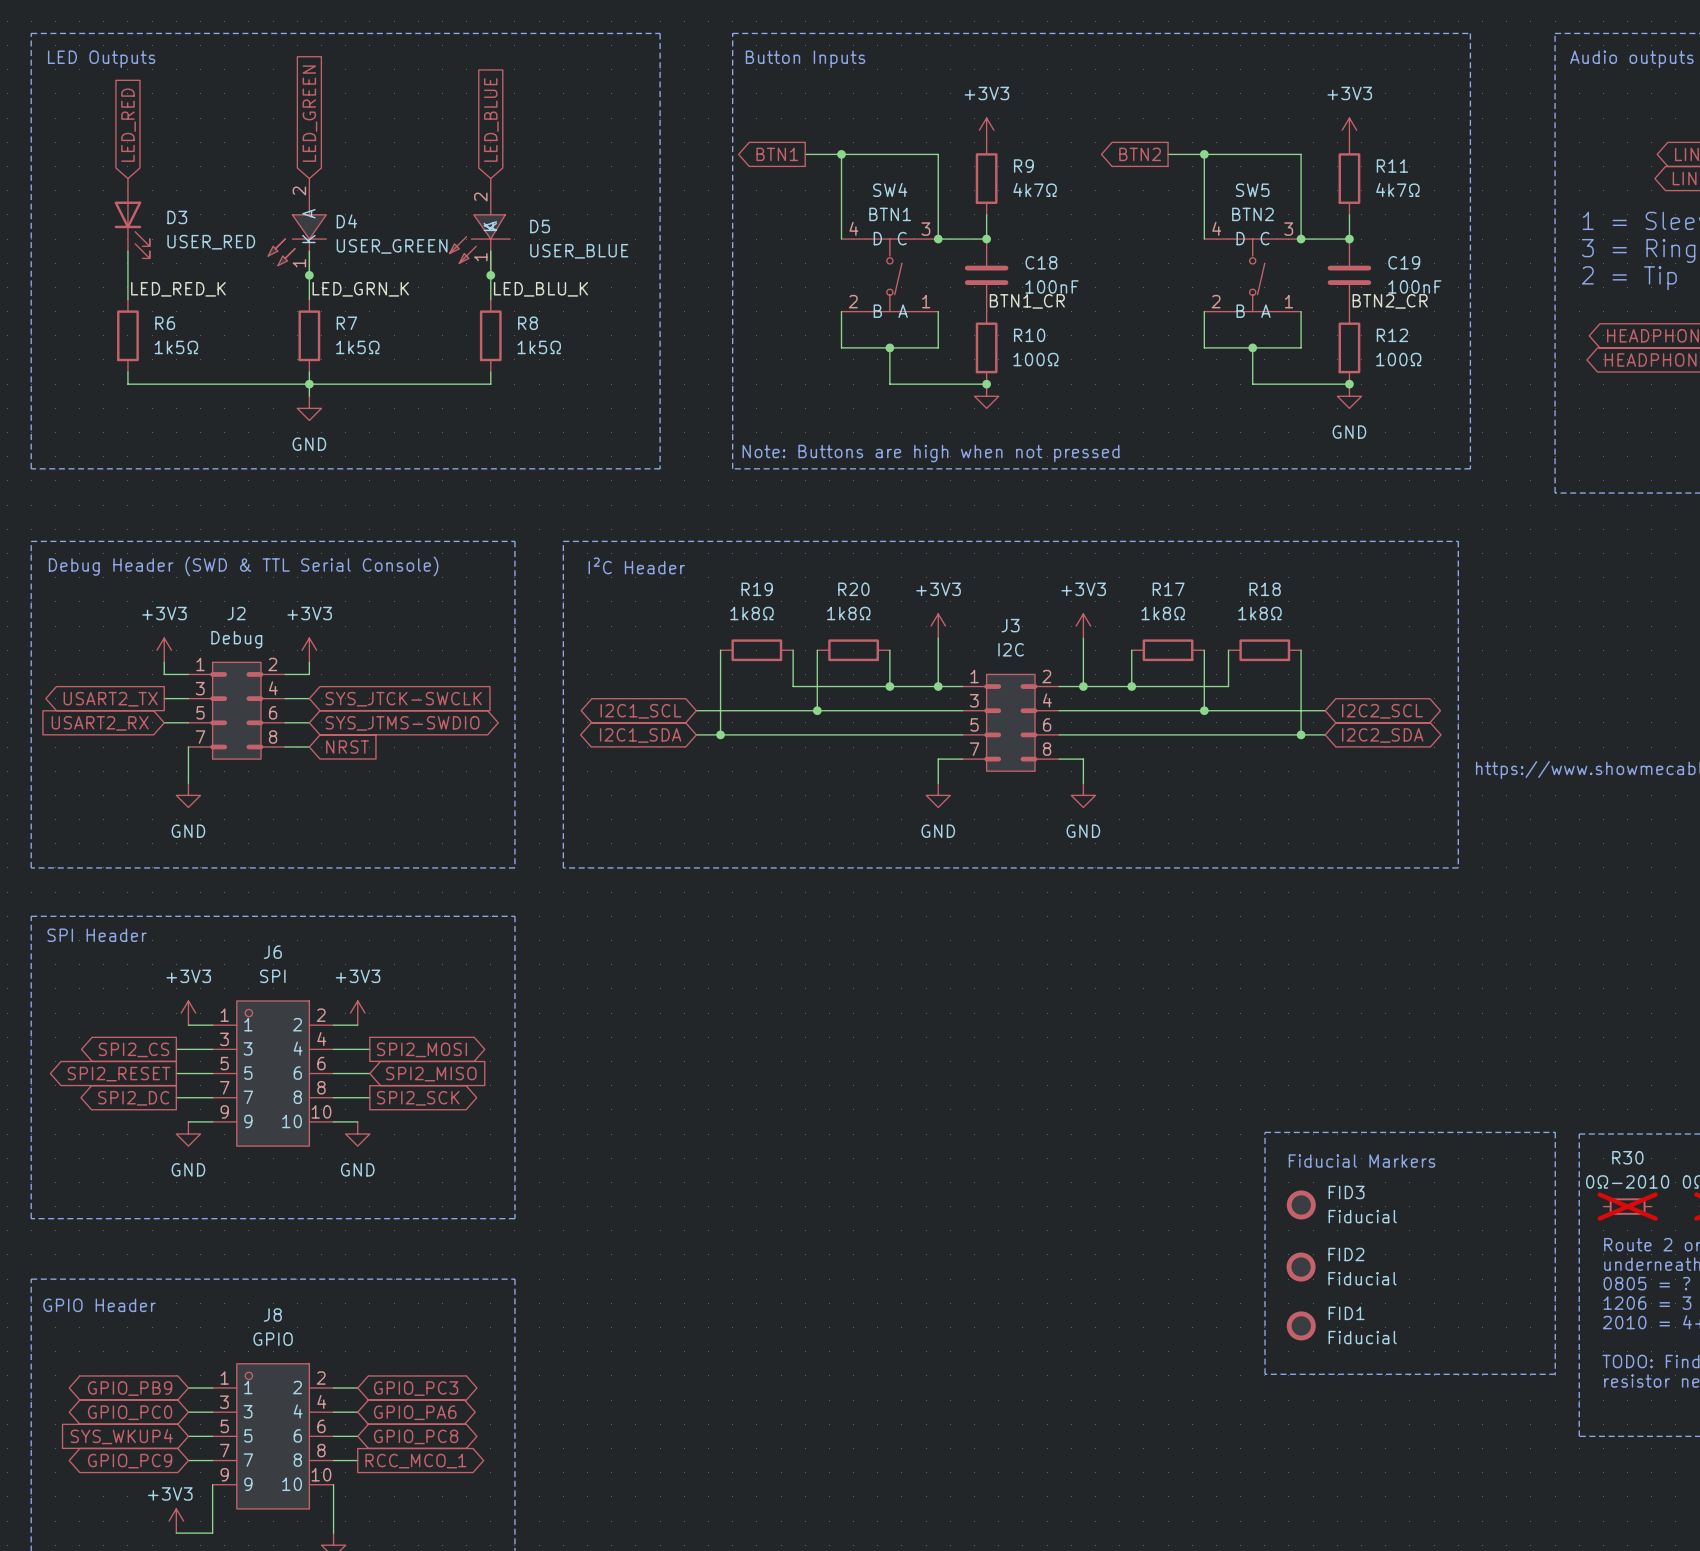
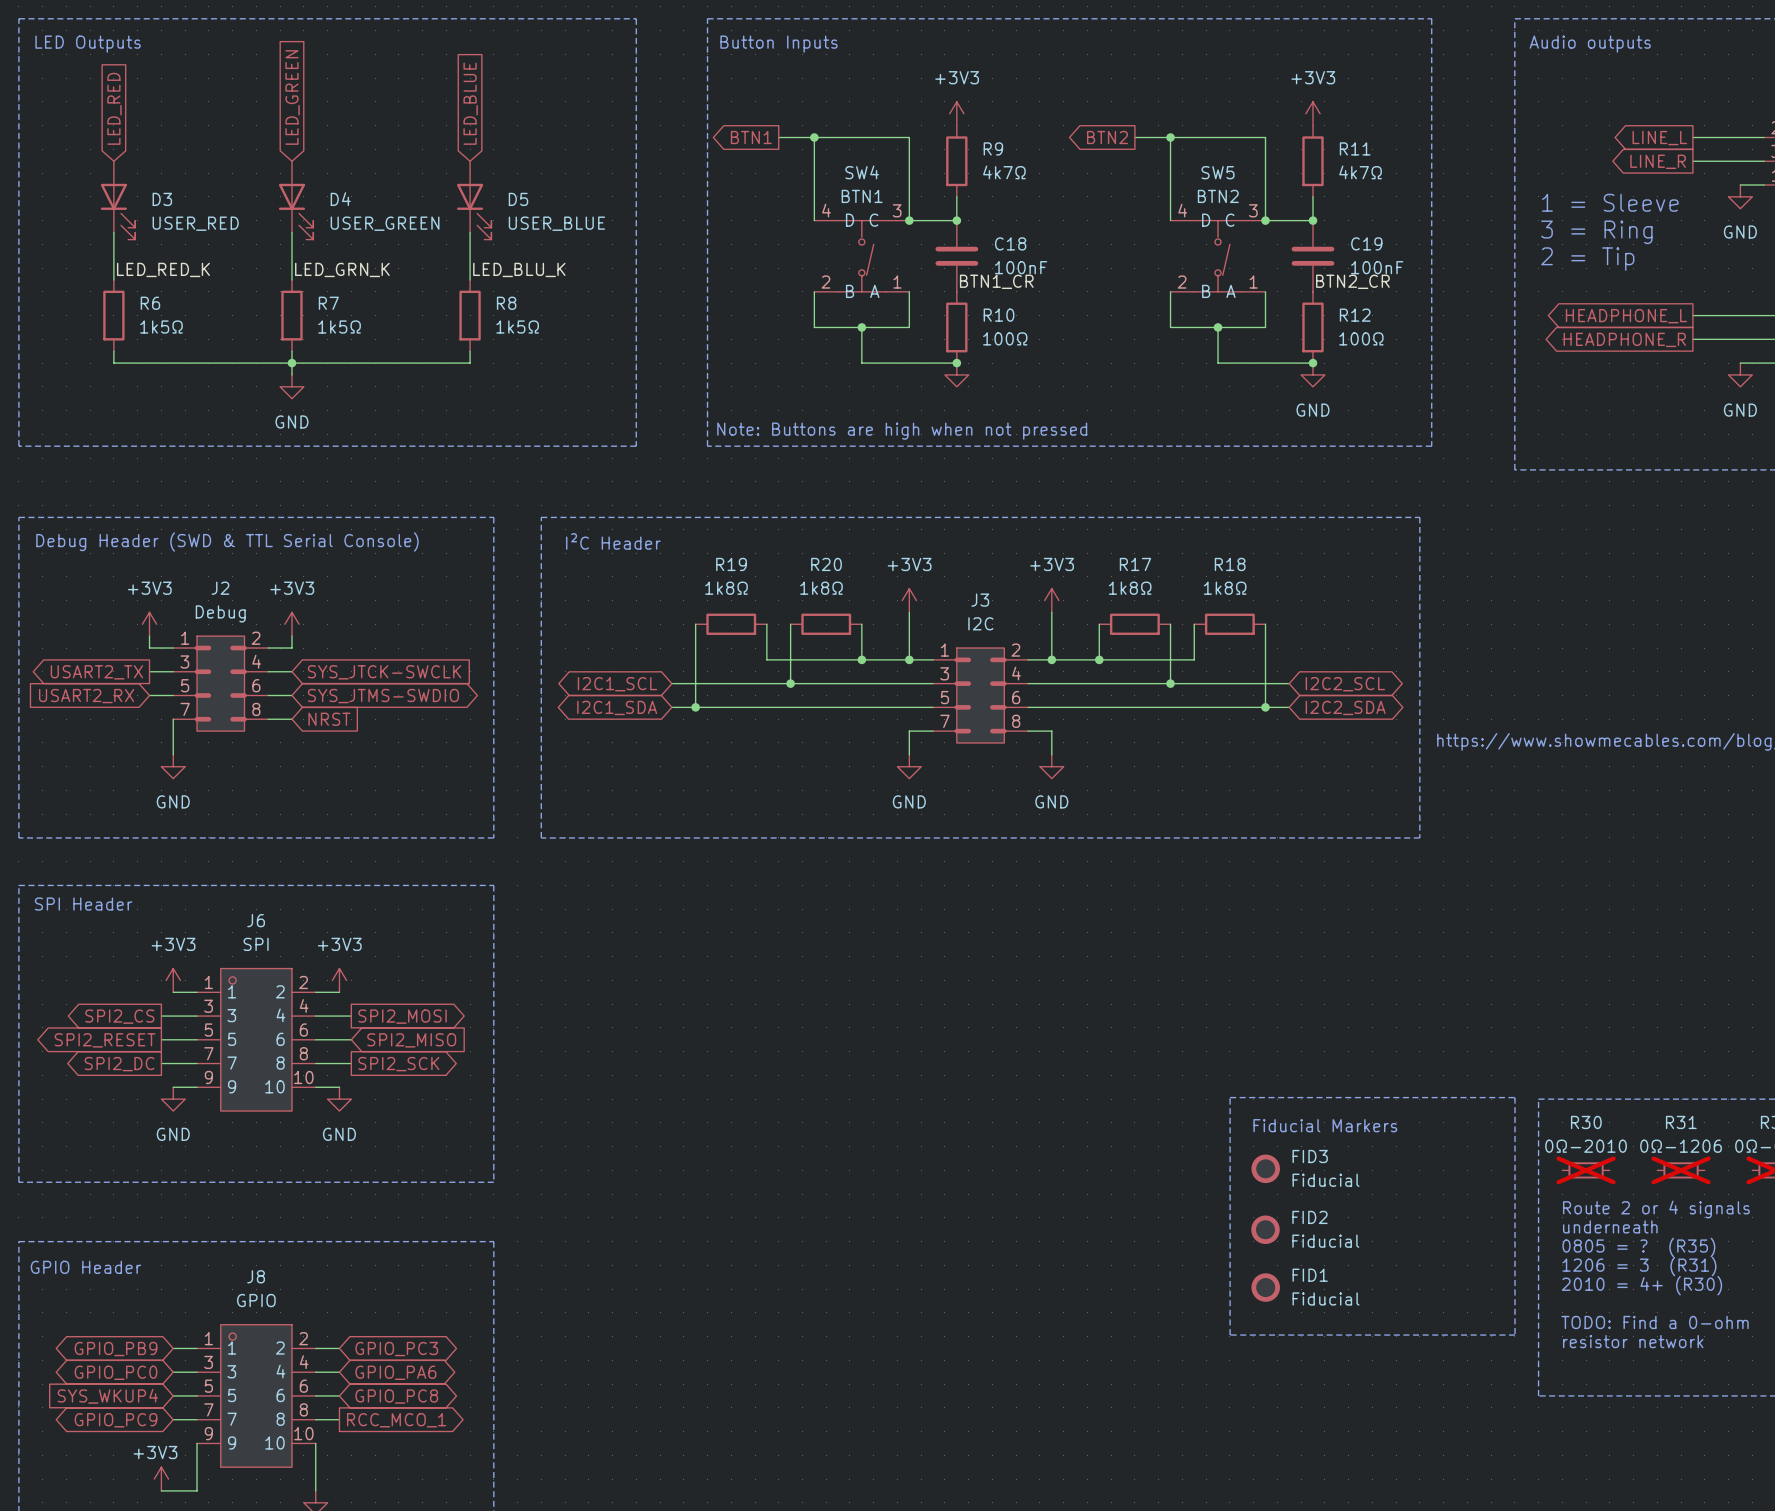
D4 symbol: [268, 178, 327, 276] -> [278, 161, 314, 240]
D5 symbol: [449, 178, 511, 276] -> [457, 161, 492, 240]
junction: (309, 275) -> none
junction: (490, 275) -> none

